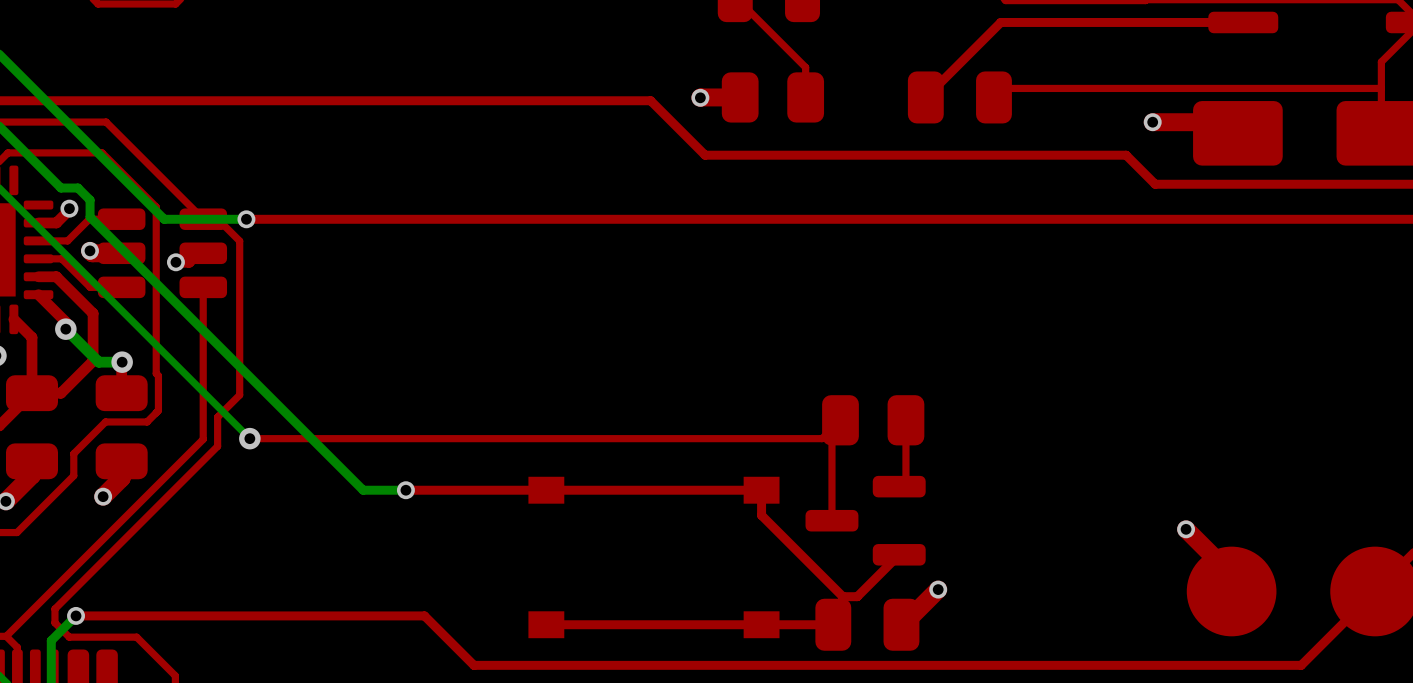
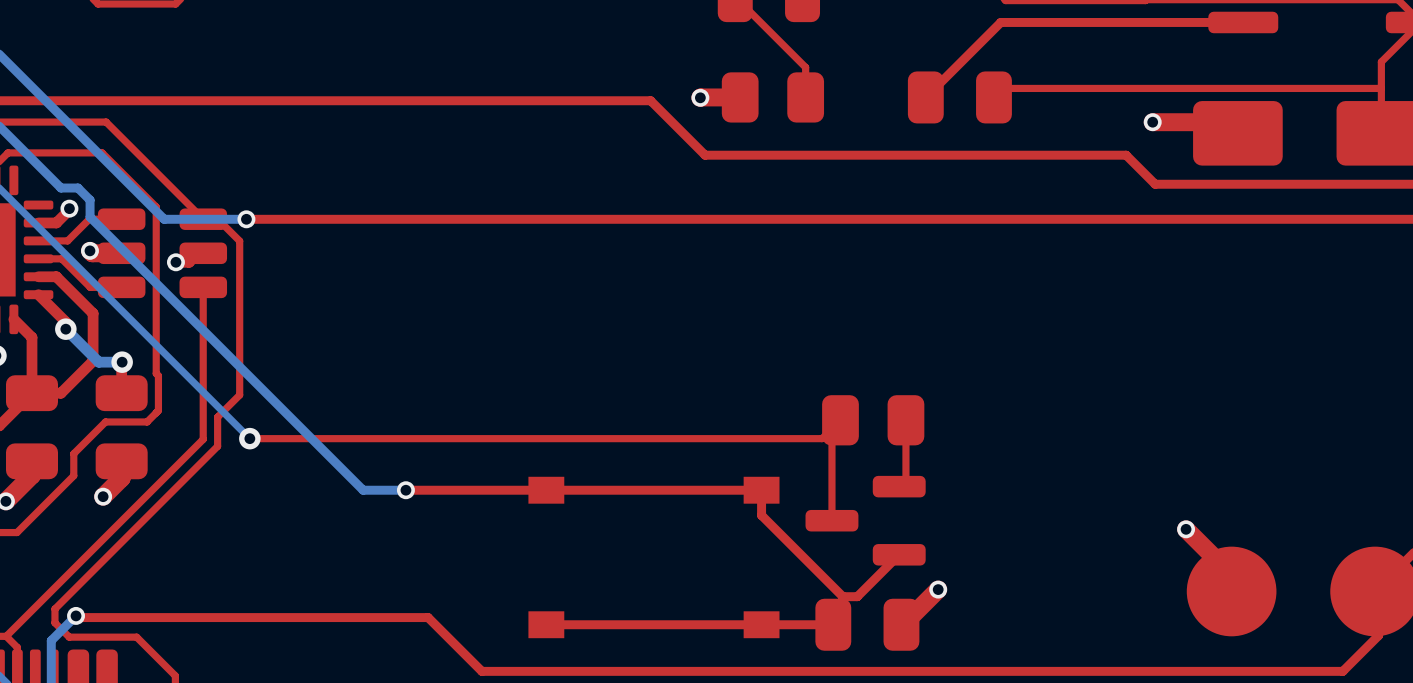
top track: (1375, 591) (1301, 665) (473, 665) (424, 615) (76, 615) -> (1375, 591) (1378, 595) (1378, 635) (1342, 671) (481, 671) (428, 617) (77, 617) (76, 615)

